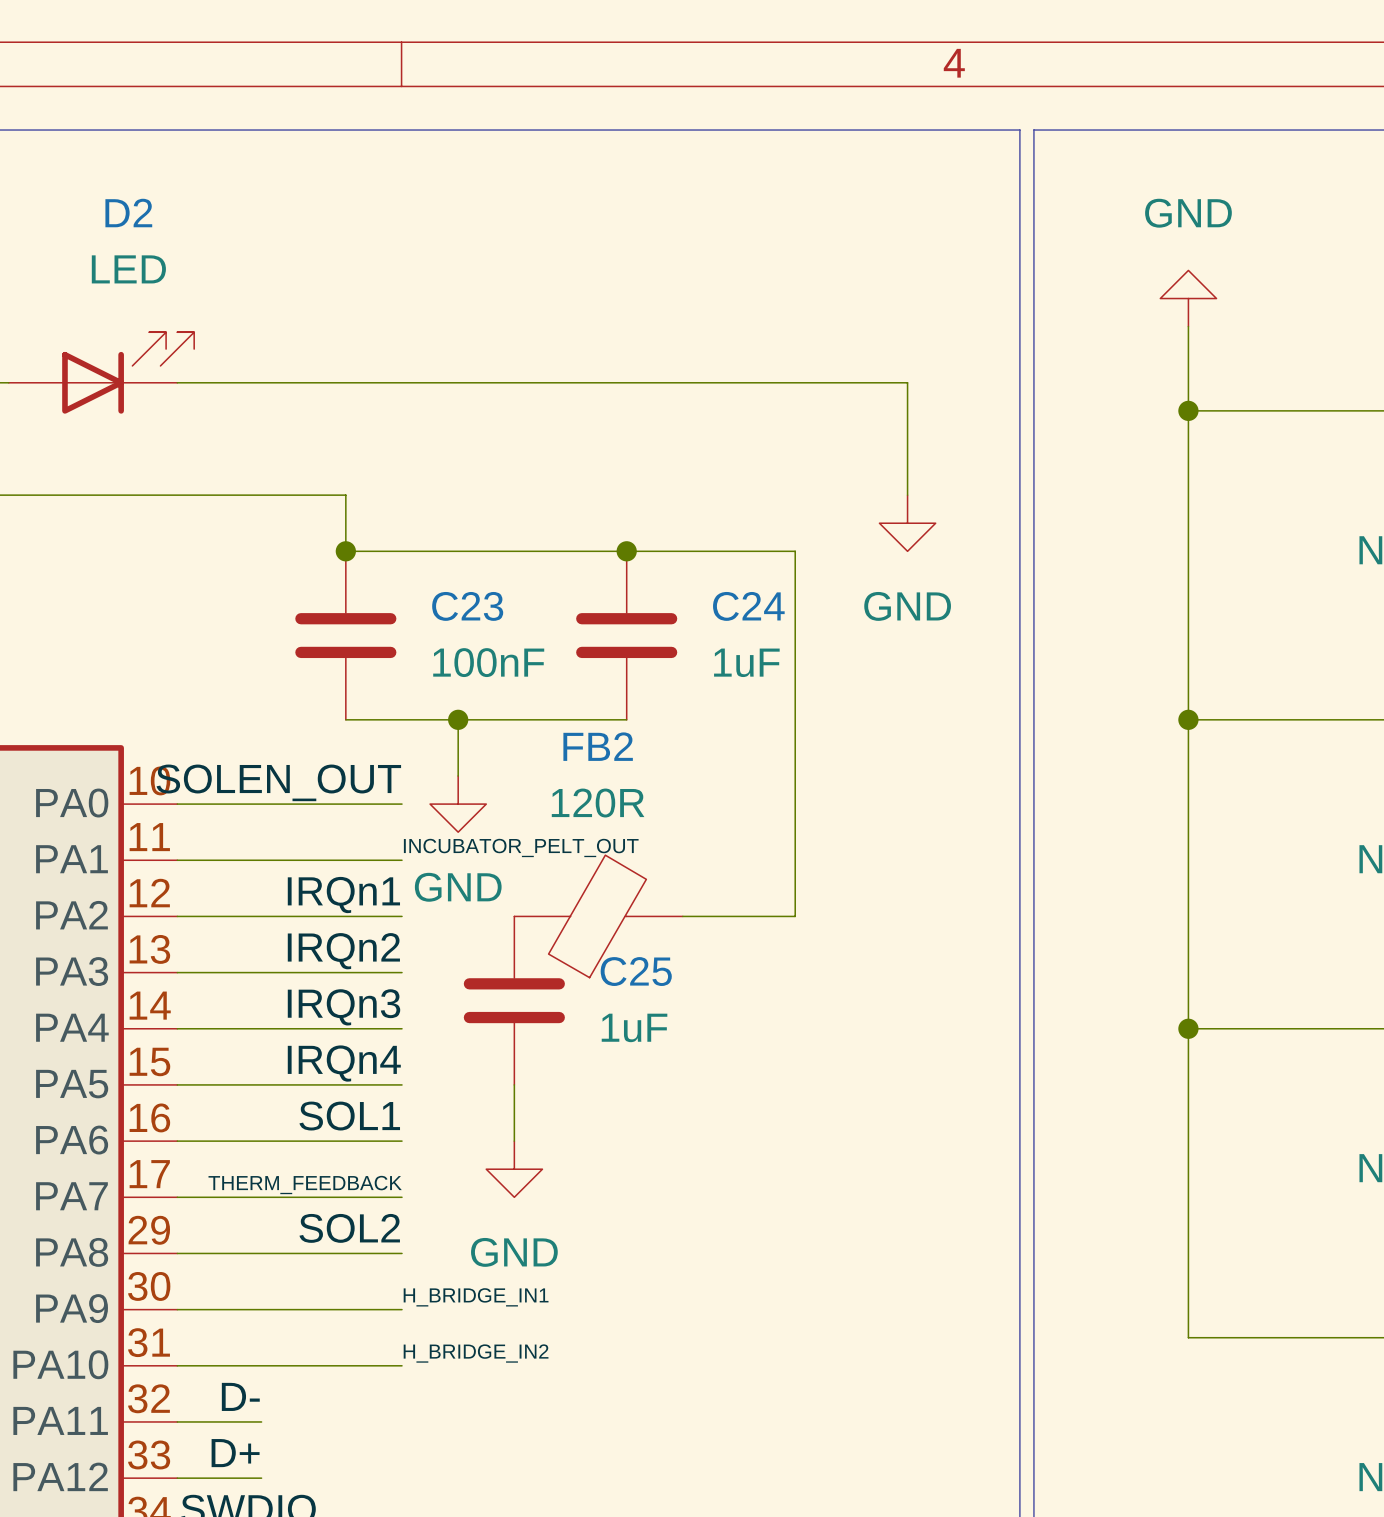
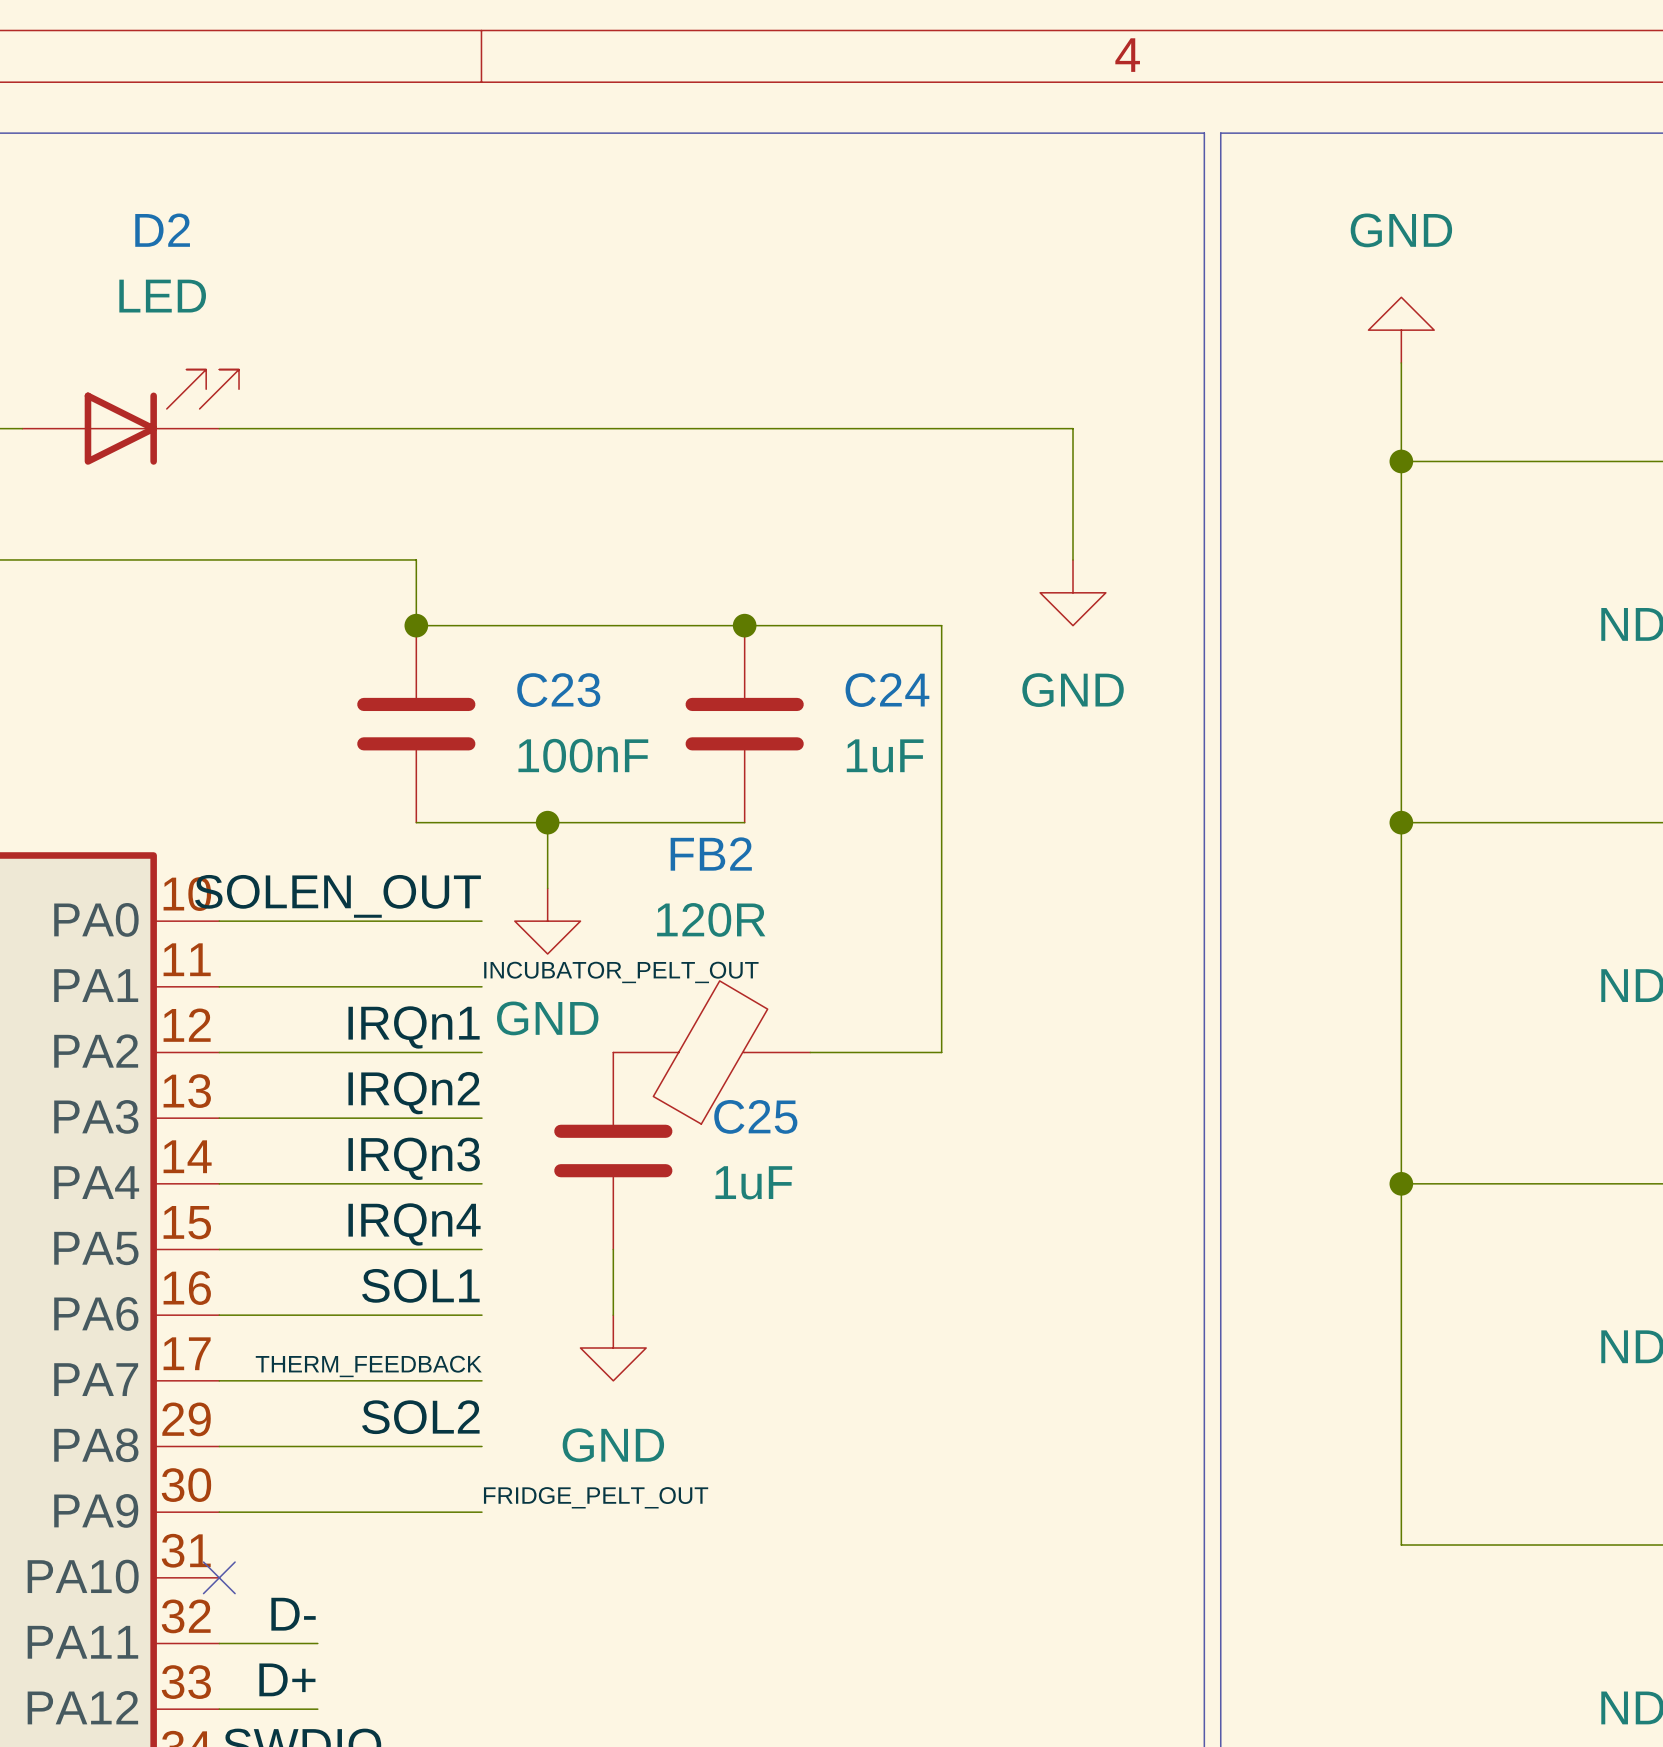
label: H_BRIDGE_IN1 (476, 1297) -> FRIDGE_PELT_OUT (596, 1497)
label: H_BRIDGE_IN2 (476, 1353) -> none
wire: (177, 1365) (402, 1365) -> none
no-connect mark: none -> (219, 1577)

